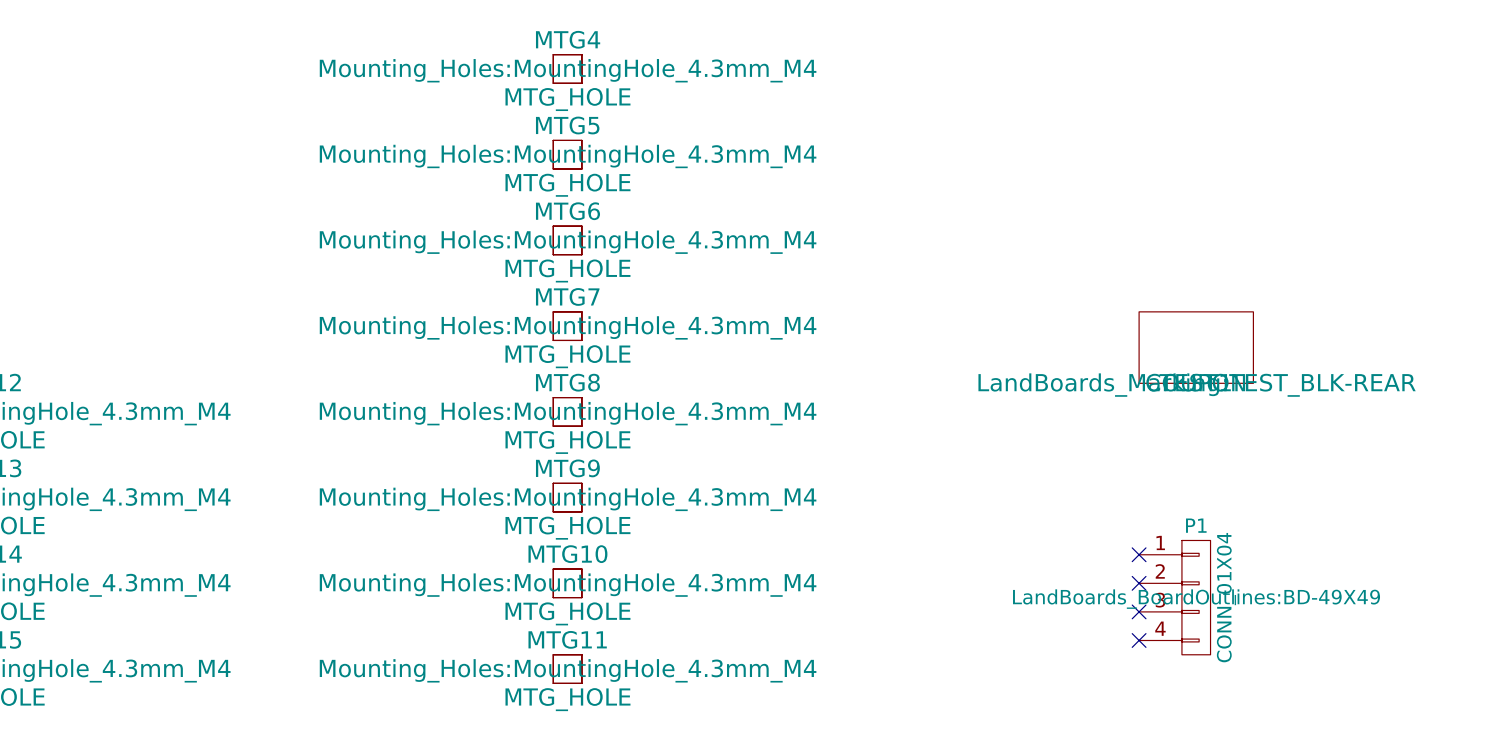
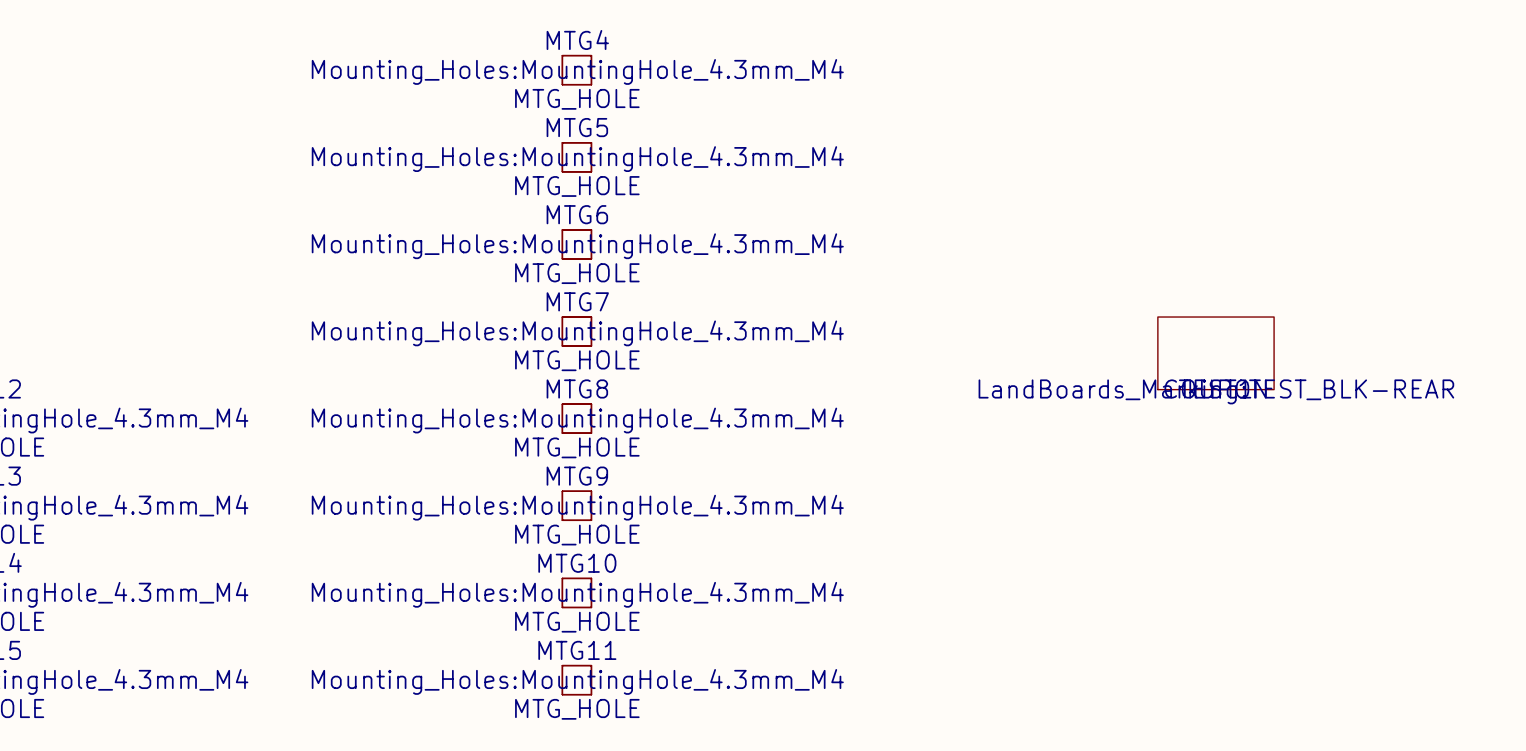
no-connect mark: (1139, 554) -> none
no-connect mark: (1139, 583) -> none
P1: CONN_01X04 (1174, 597) -> none
no-connect mark: (1139, 611) -> none
no-connect mark: (1139, 640) -> none

